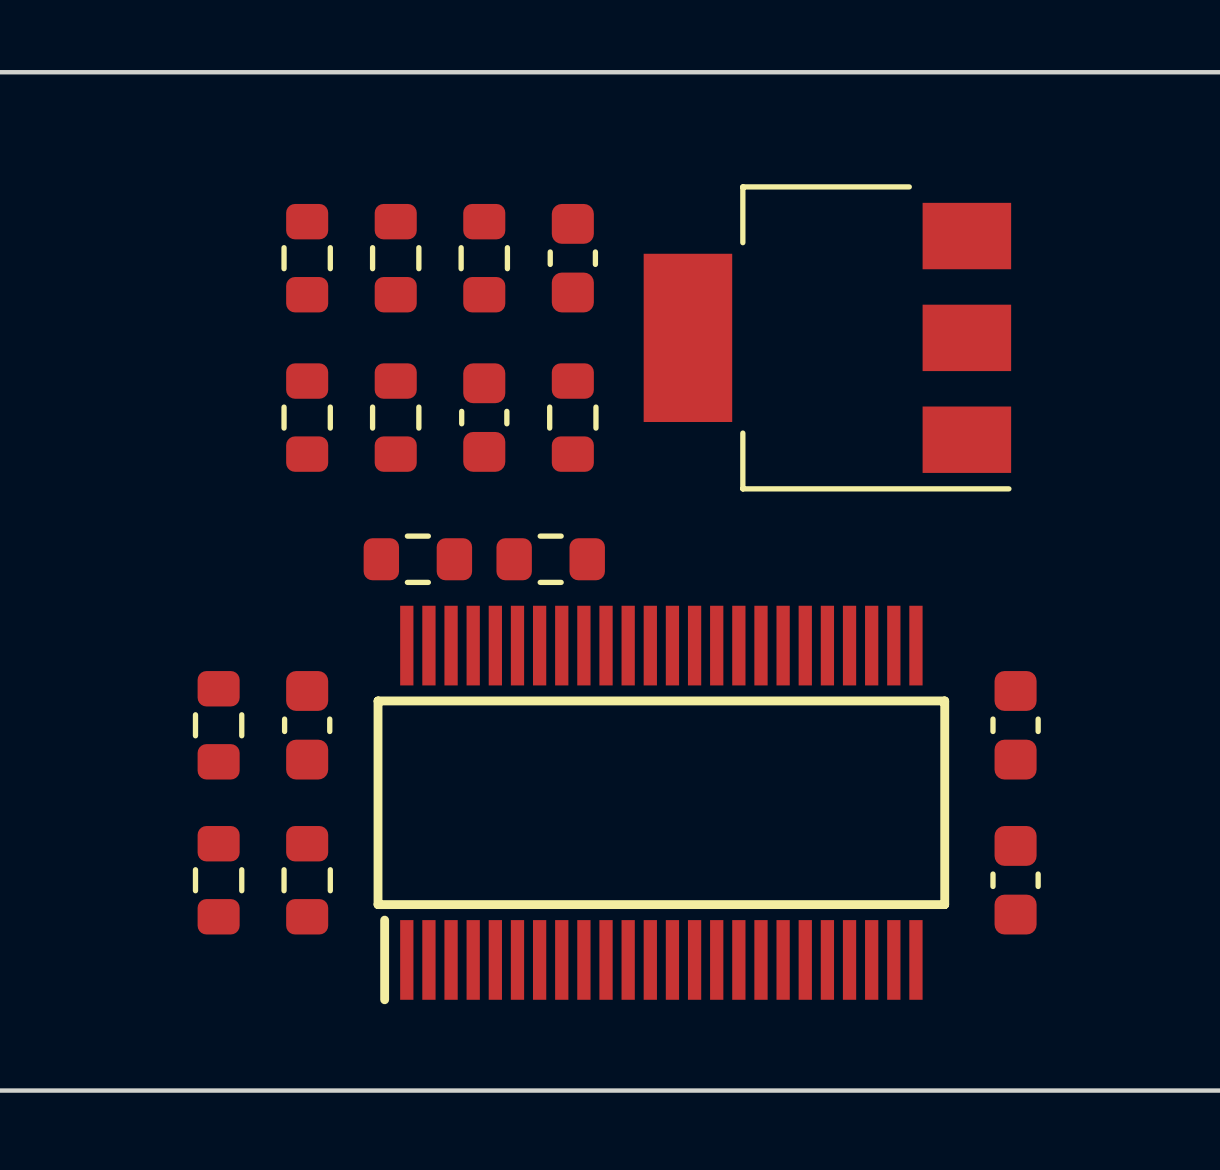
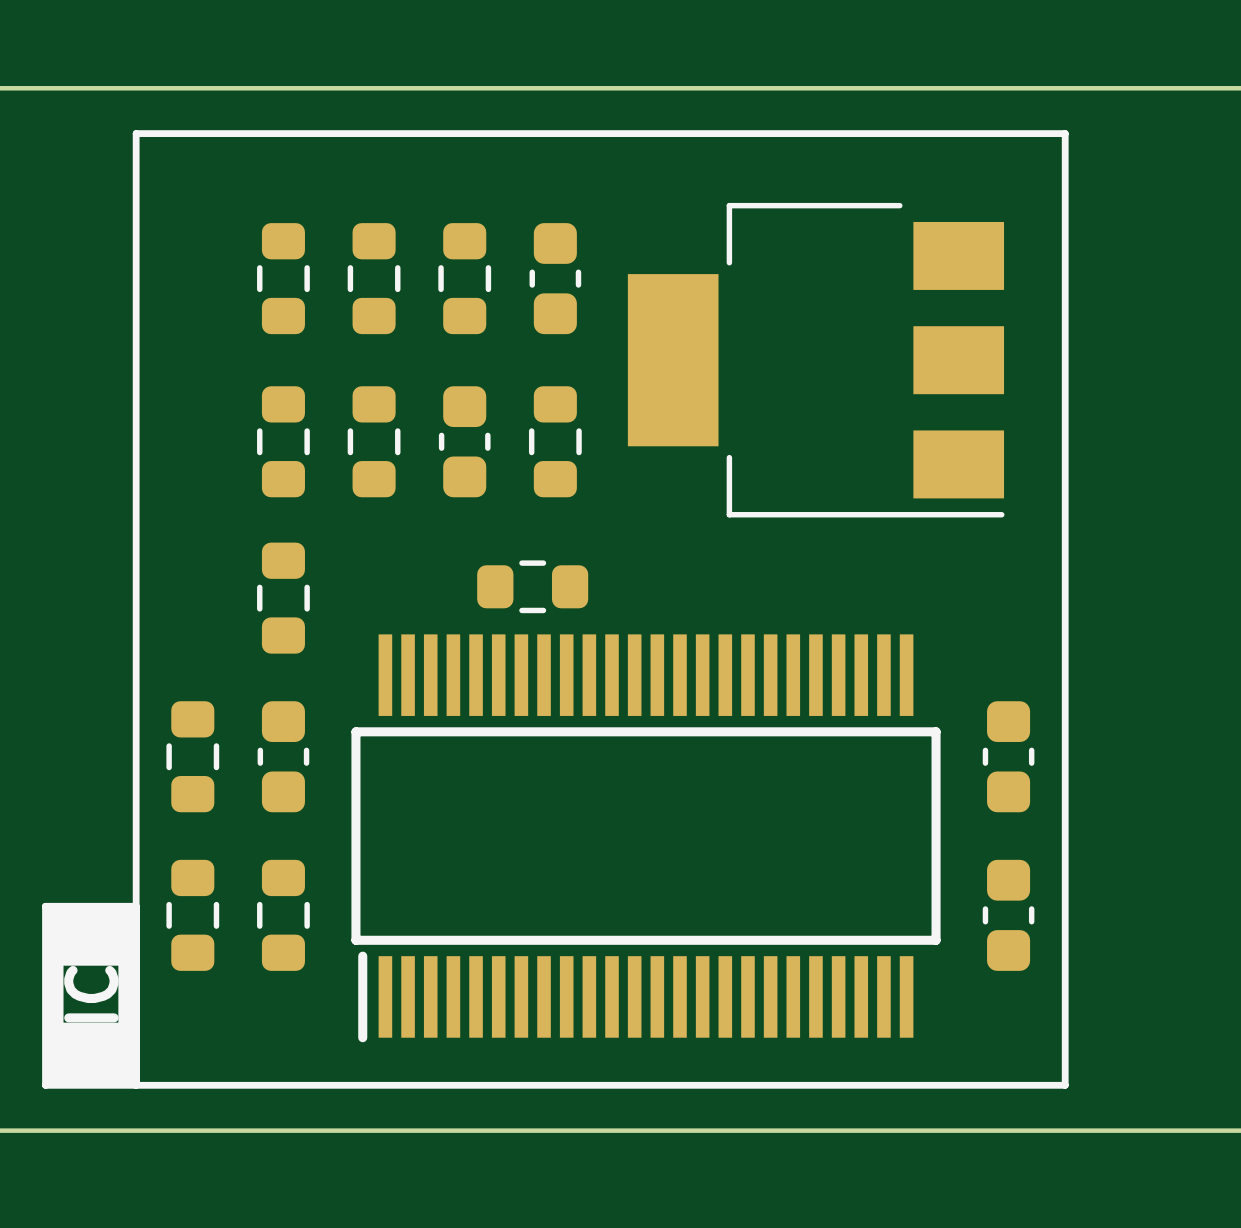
part rotation: 0° (417, 559) -> 90° clockwise (283, 598)
part position: (417, 559) -> (283, 598)
drawing: none -> [45, 906, 137, 1086]
line: none -> (136, 906) (45, 906) (45, 1085) (1065, 1085) (1065, 133) (136, 133) (136, 1085)
text: none -> IC (91, 994)

